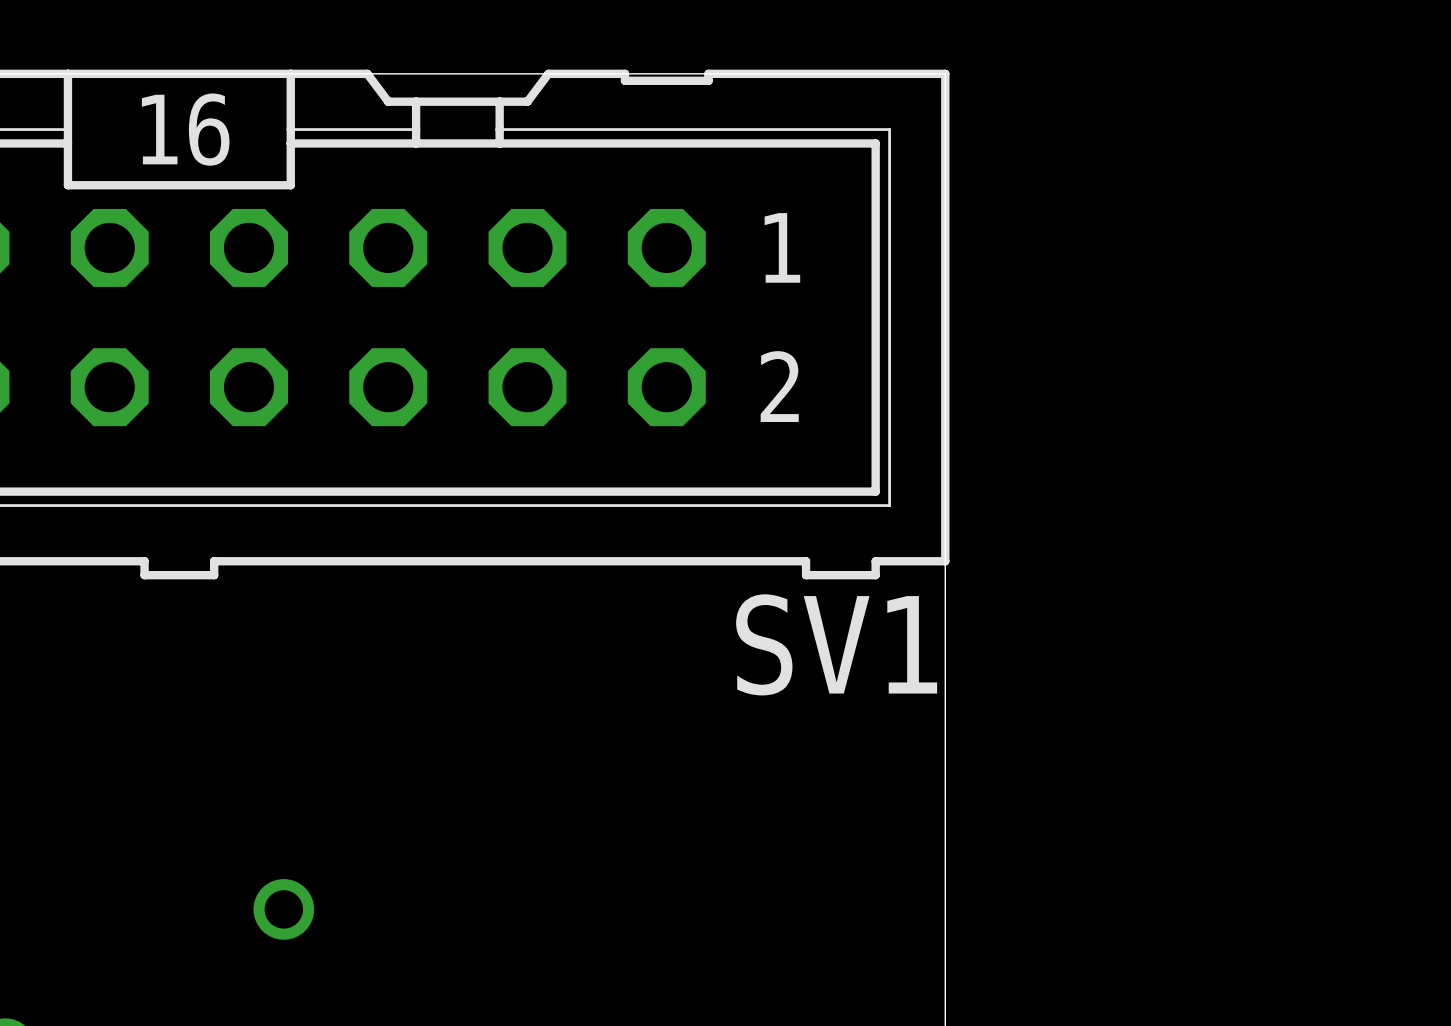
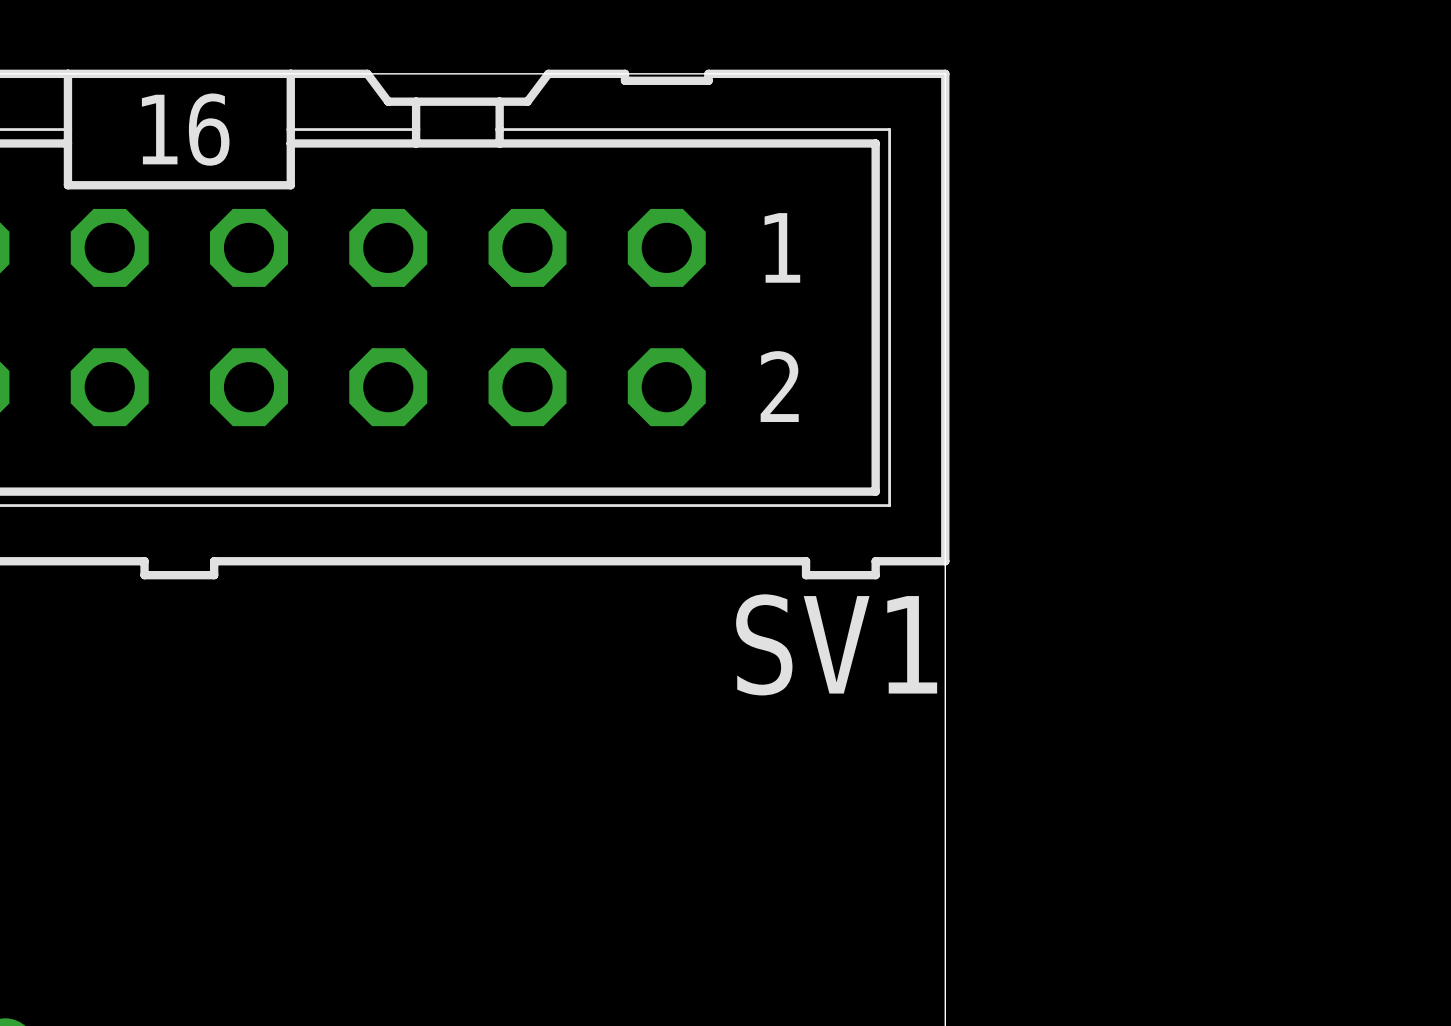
via: (283, 909) -> none

